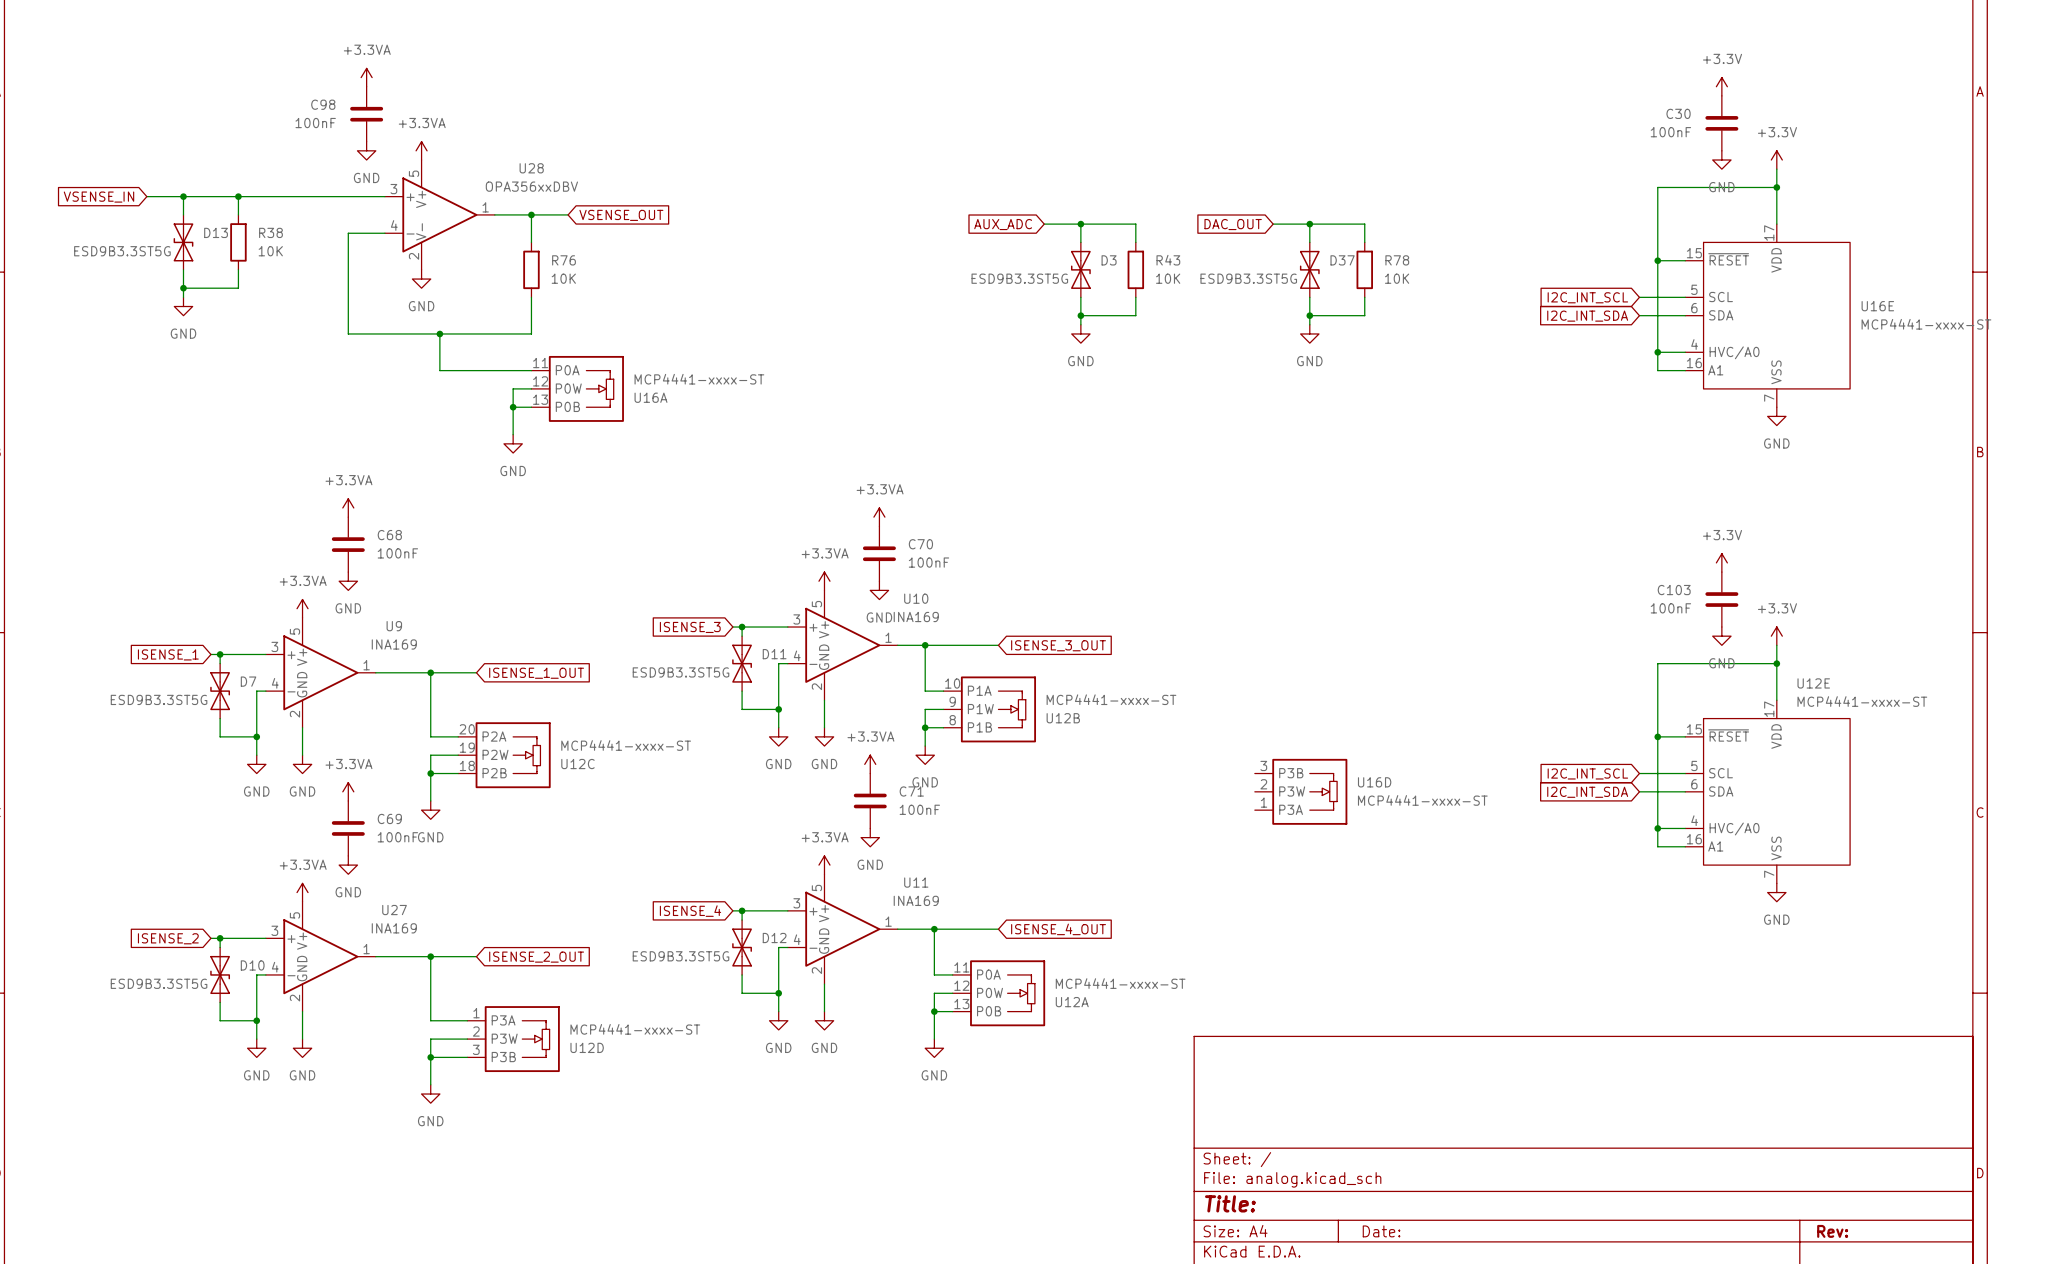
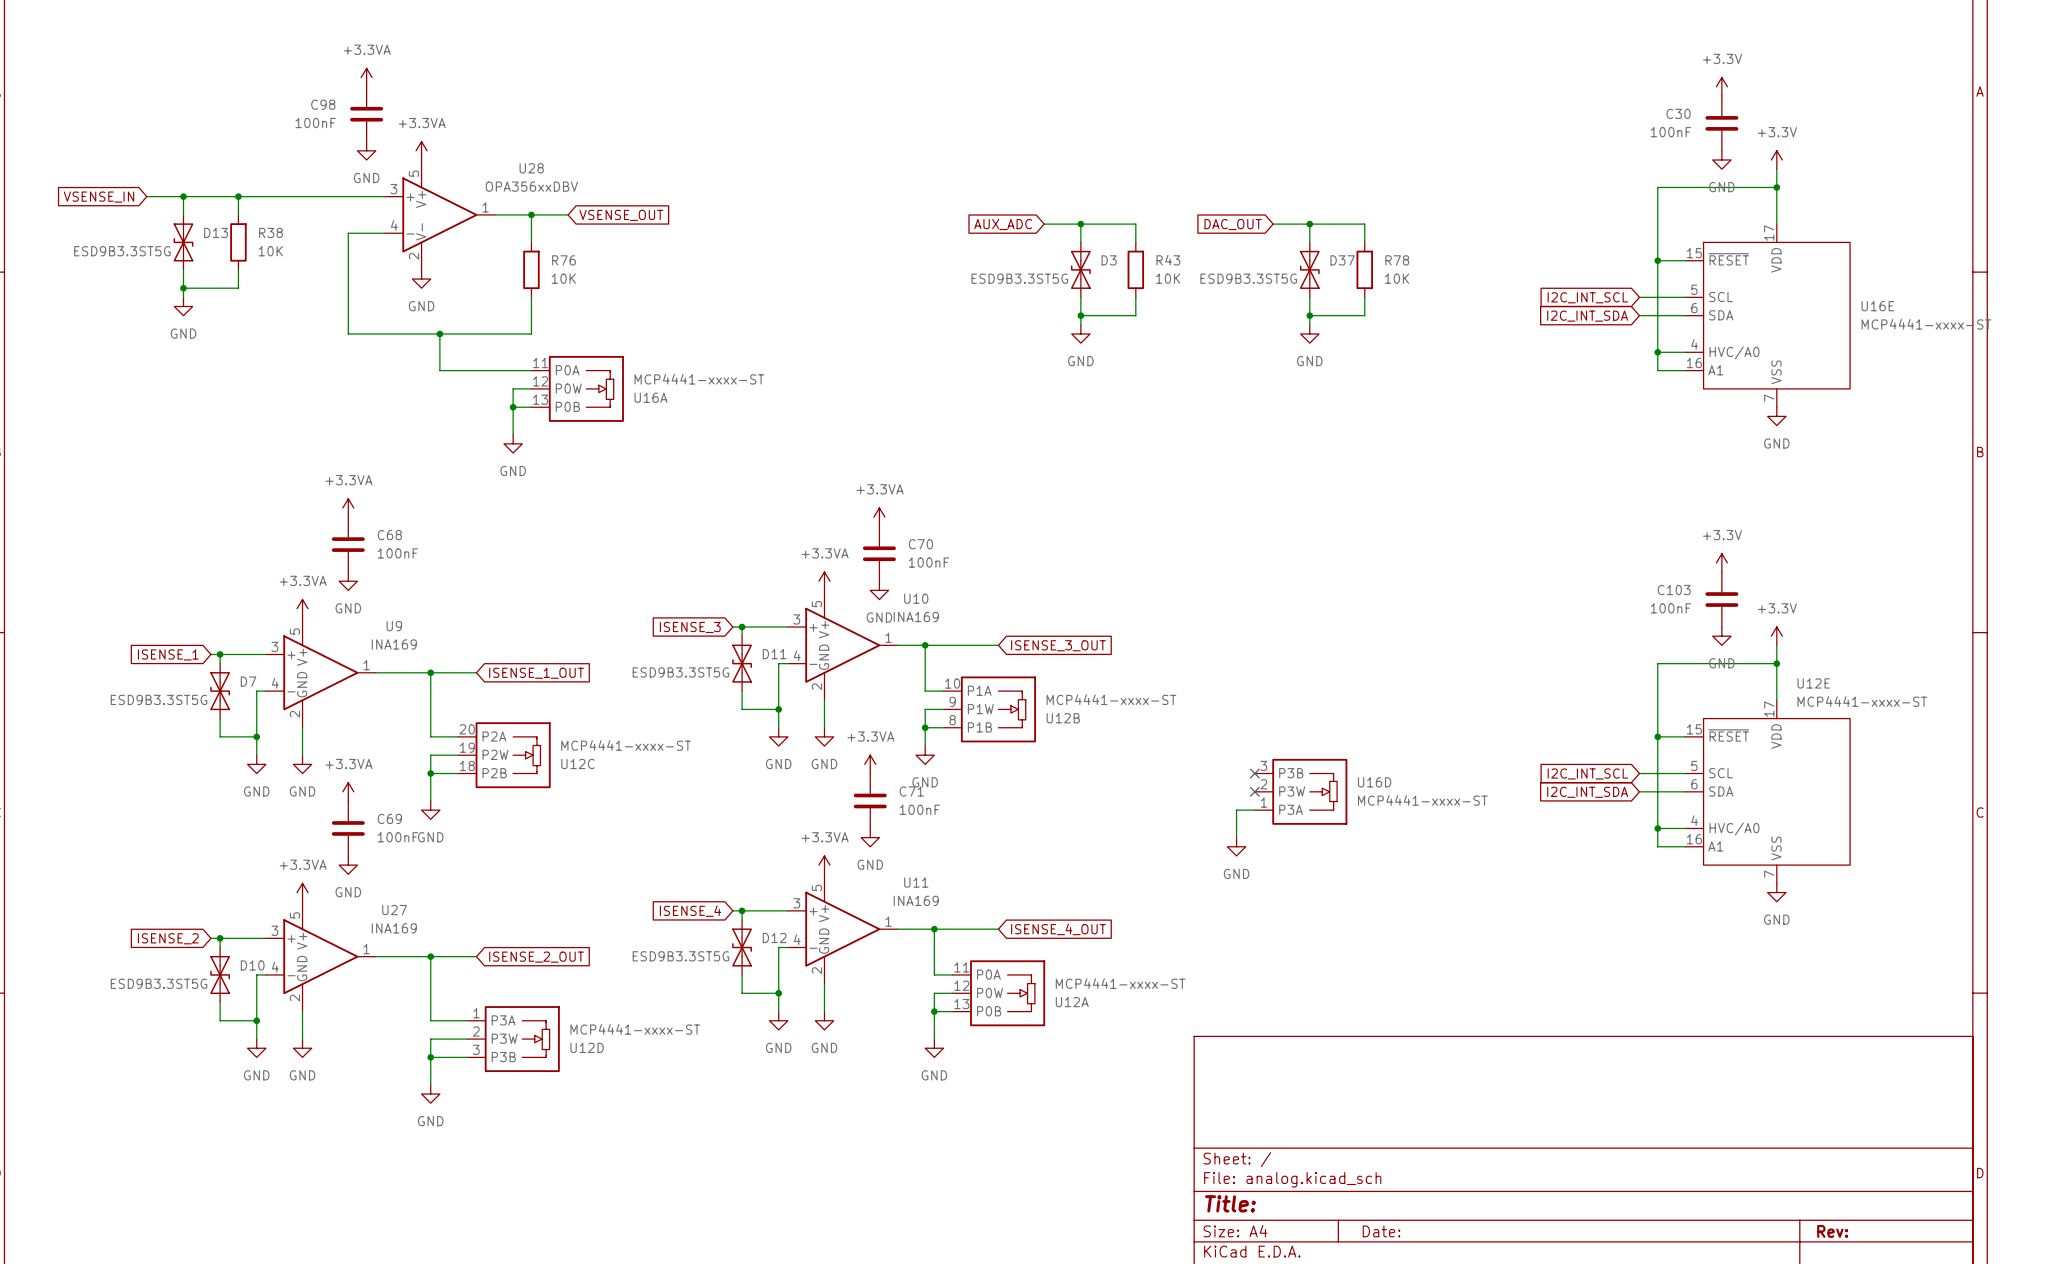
no-connect mark: none -> (1254, 773)
no-connect mark: none -> (1254, 791)
wire: none -> (1254, 810) (1236, 810) (1236, 837)
power symbol: none -> GND (1236, 846)

